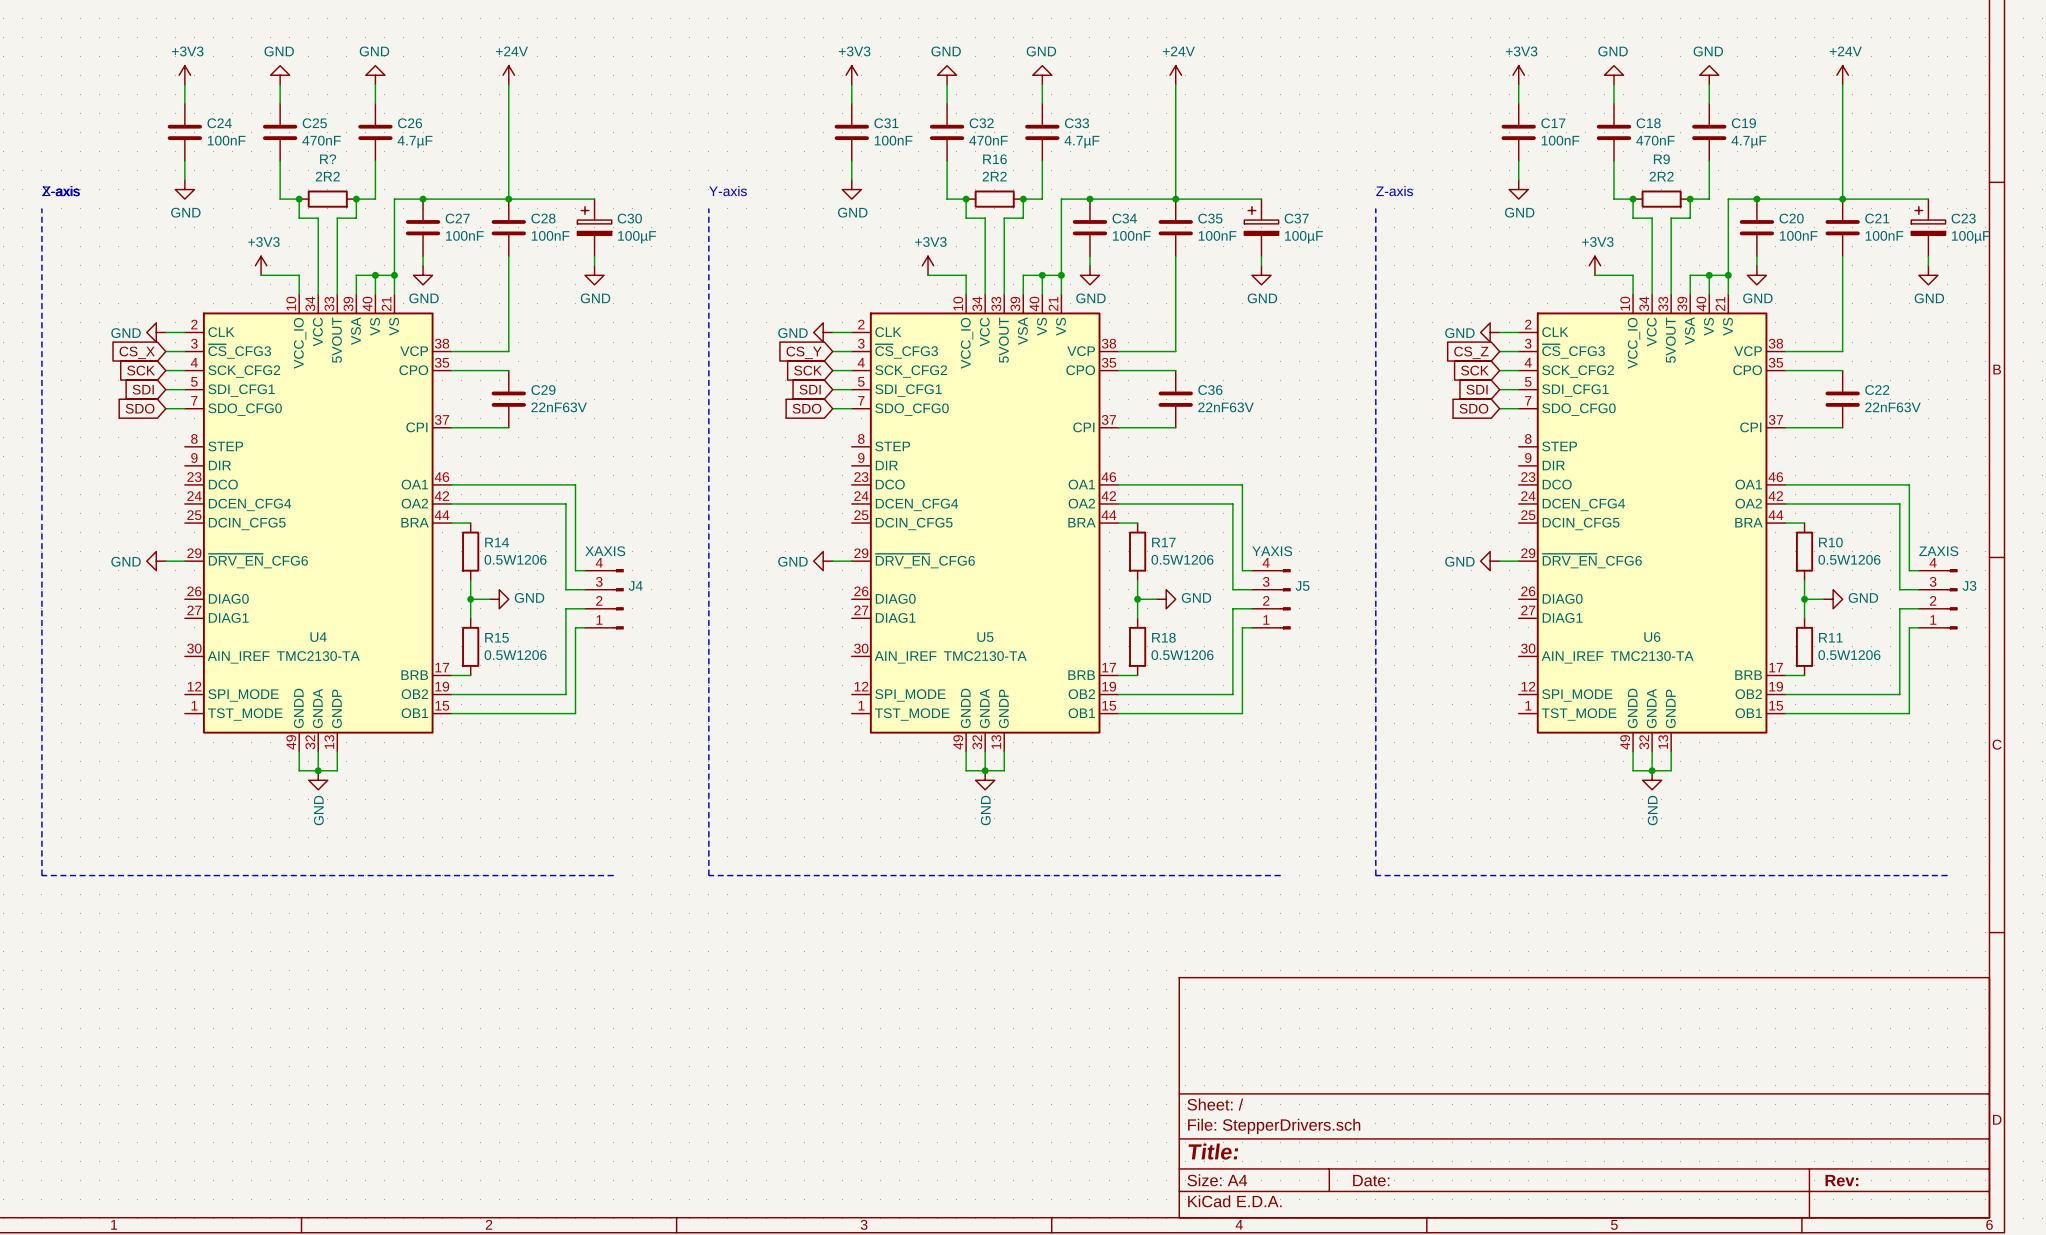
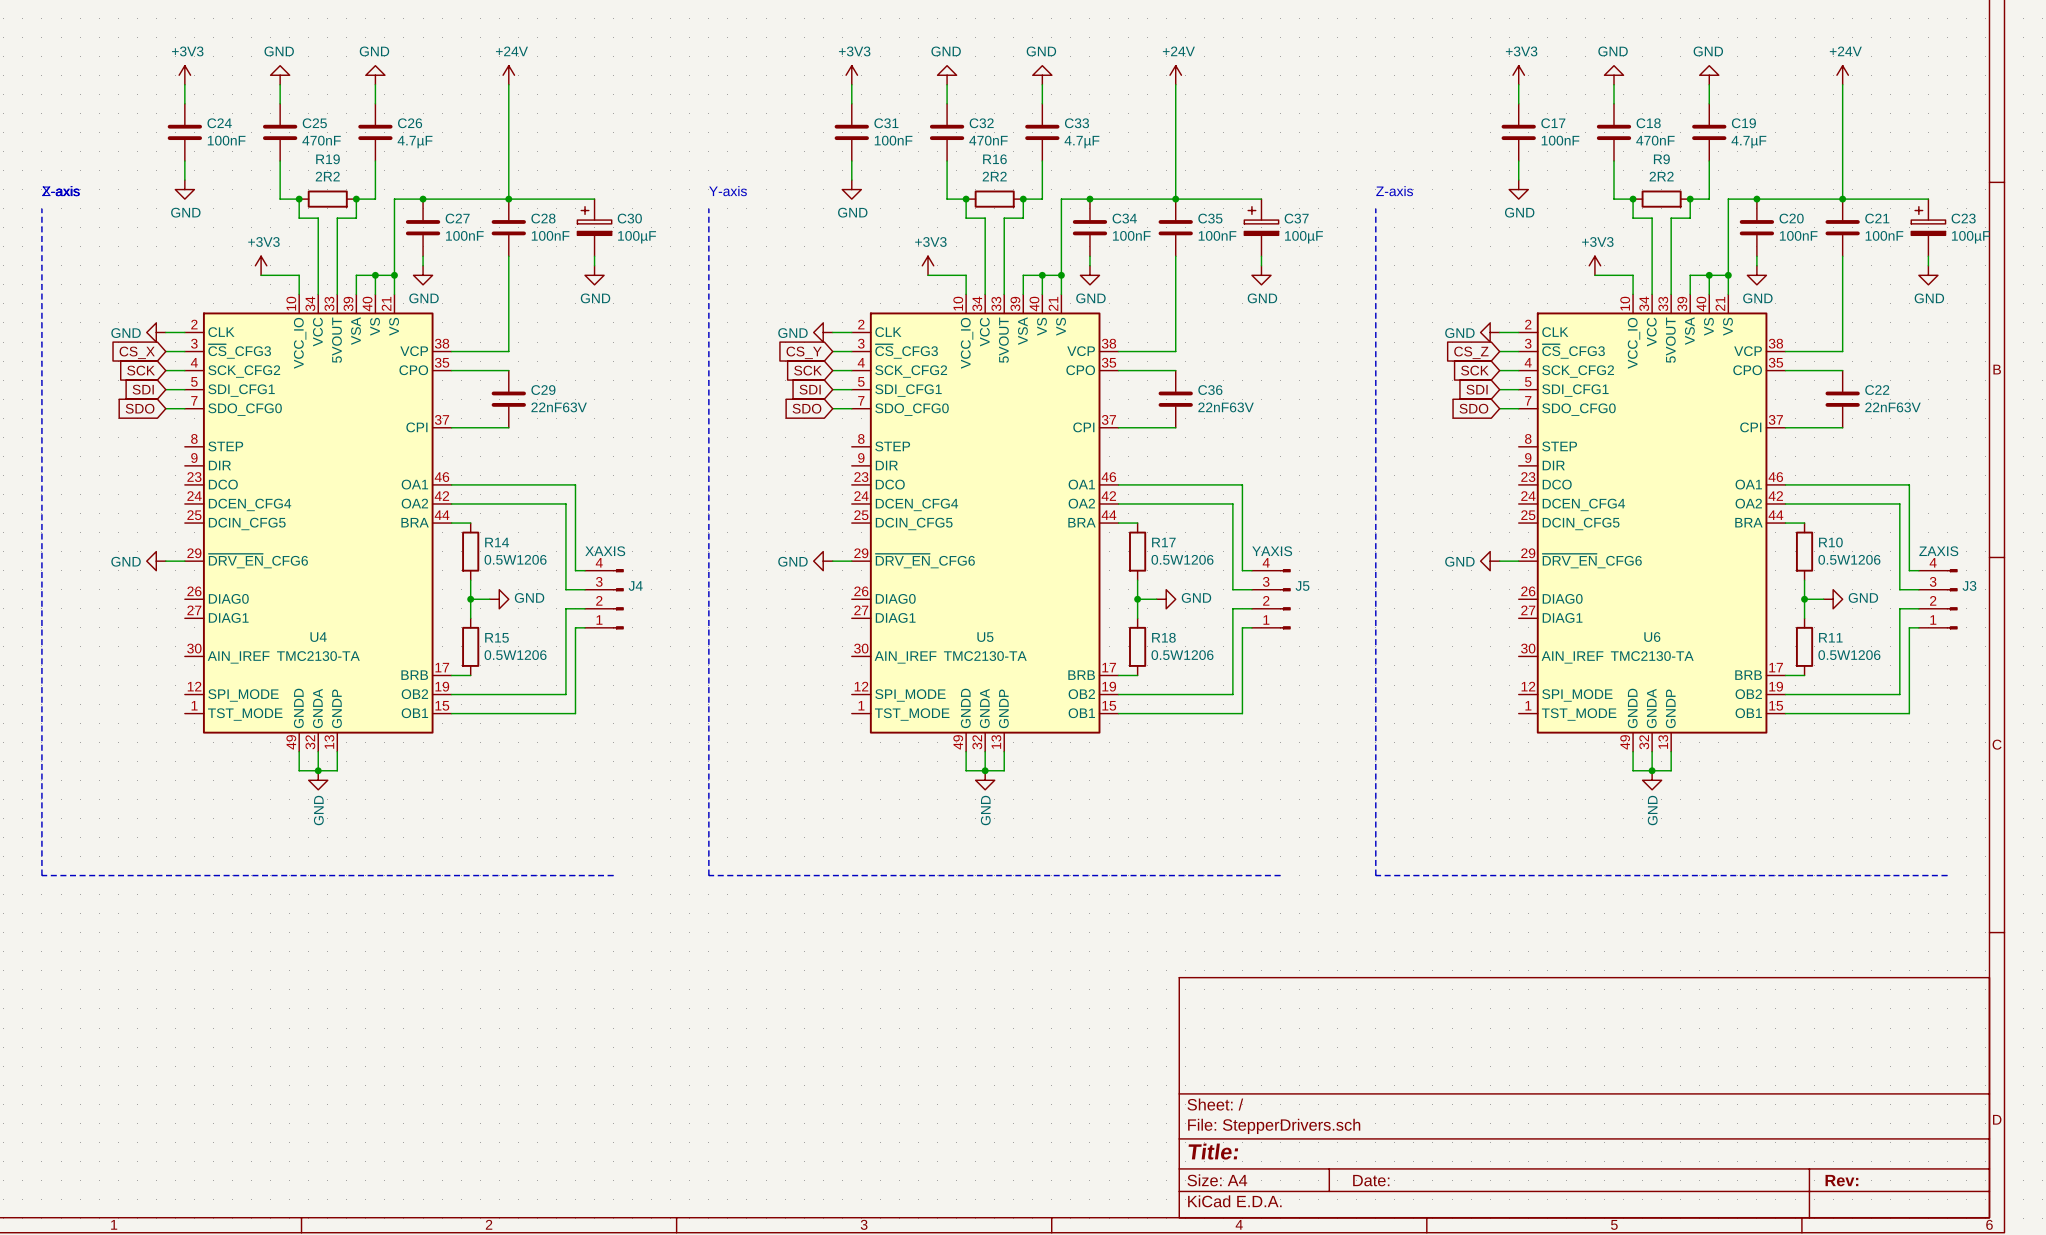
R? name: R? (328, 159) -> R19 (328, 159)

